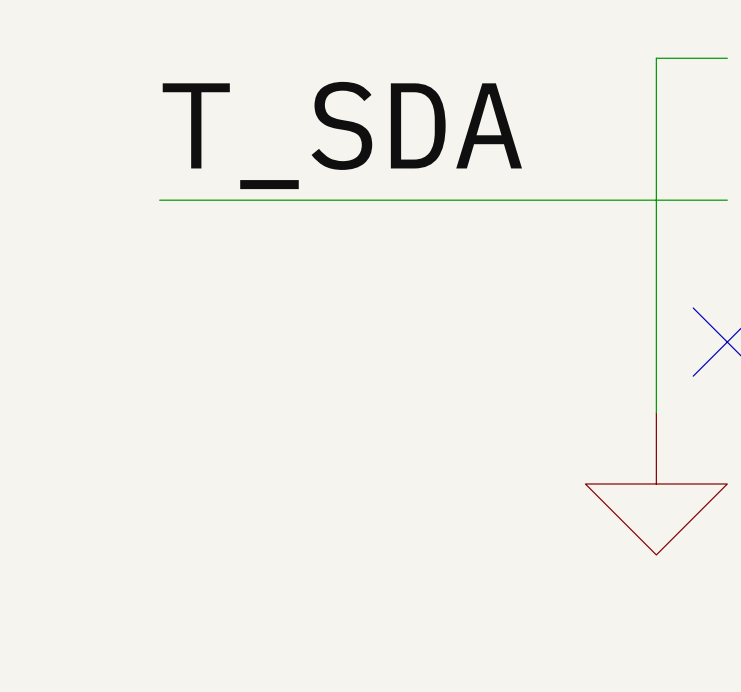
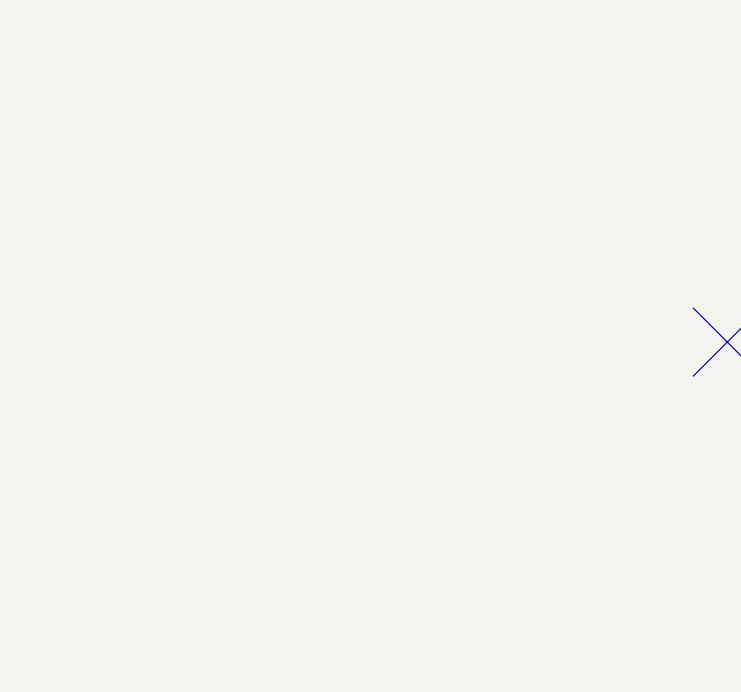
wire: (727, 58) (656, 58) (656, 413) -> none
label: T_SDA (342, 135) -> none
wire: (159, 200) (727, 200) -> none
power symbol: (656, 483) -> none

